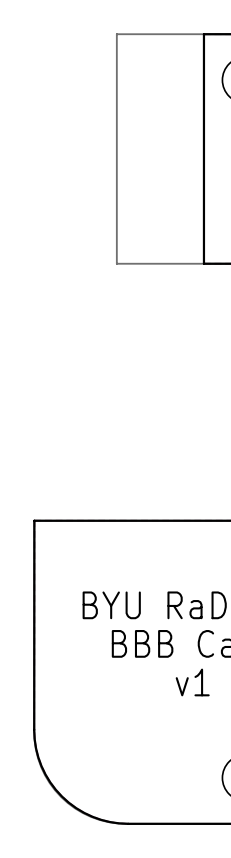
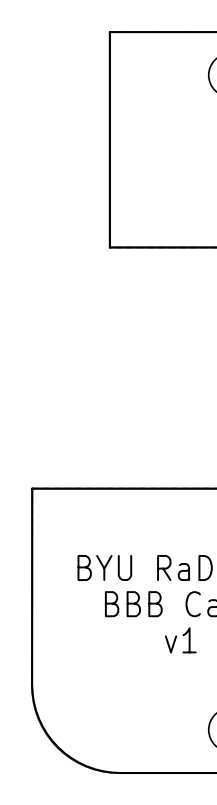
board edge: (203, 34) (203, 263) -> (191, 32) (109, 32) (109, 247) (191, 247)

